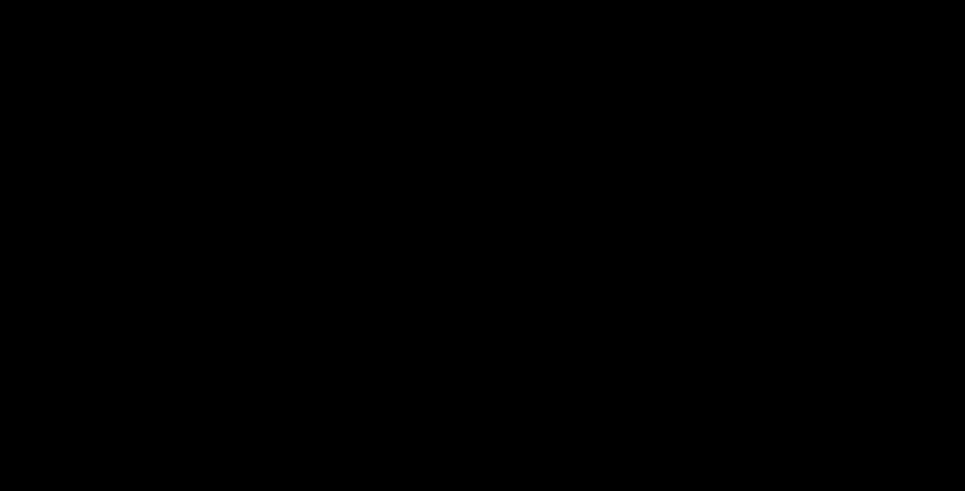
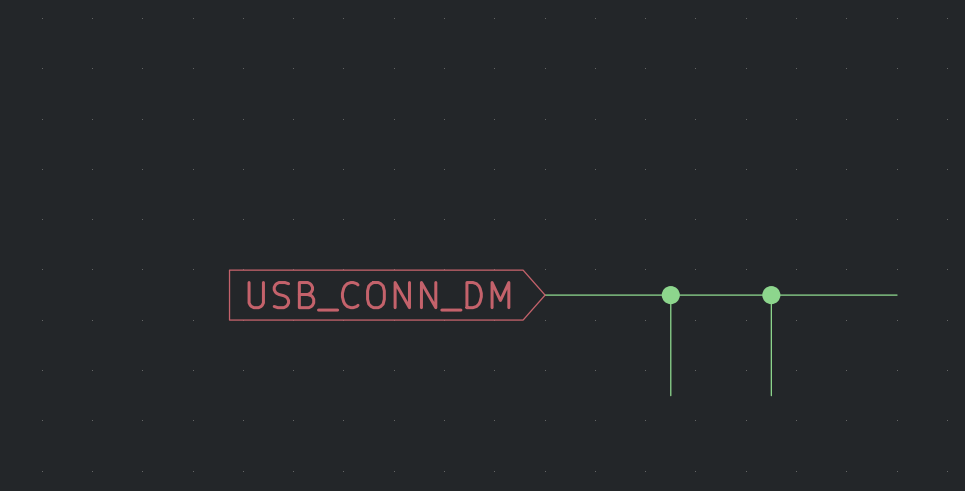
wire: none -> (545, 295) (897, 295)
wire: none -> (670, 295) (670, 395)
junction: none -> (670, 295)
wire: none -> (771, 295) (771, 395)
junction: none -> (771, 295)
global label: none -> USB_CONN_DM (378, 296)

